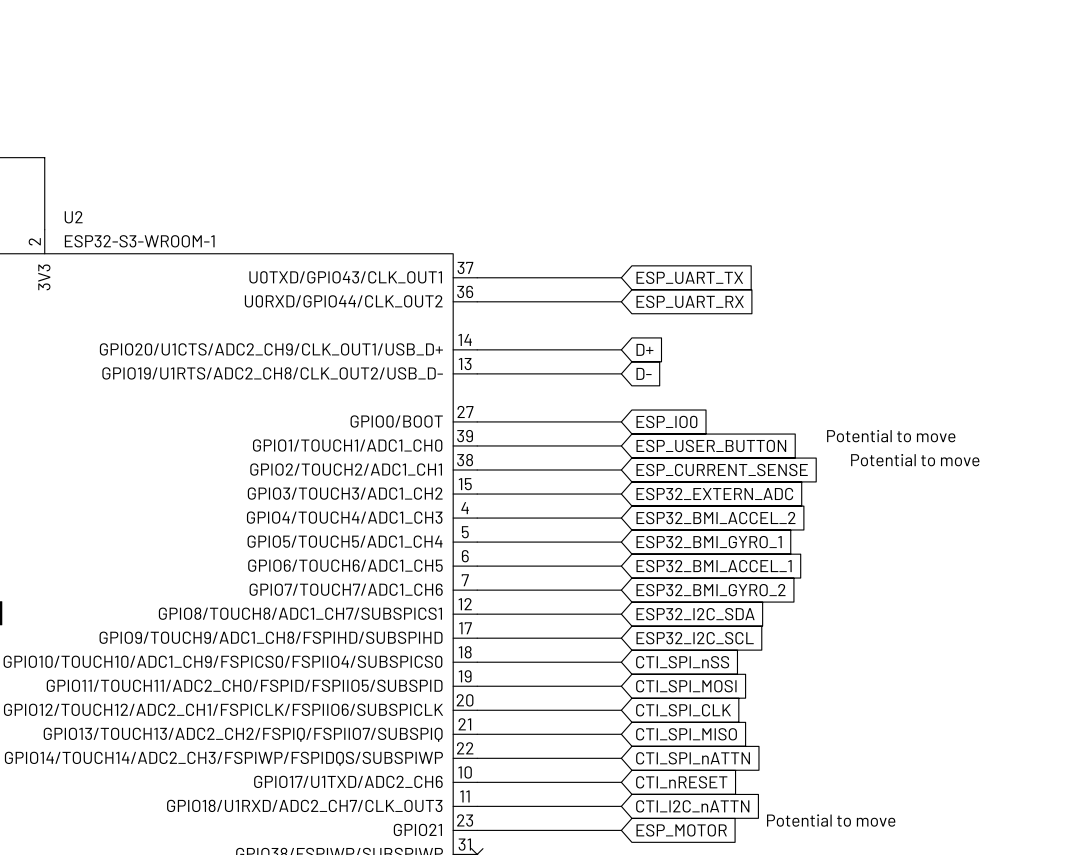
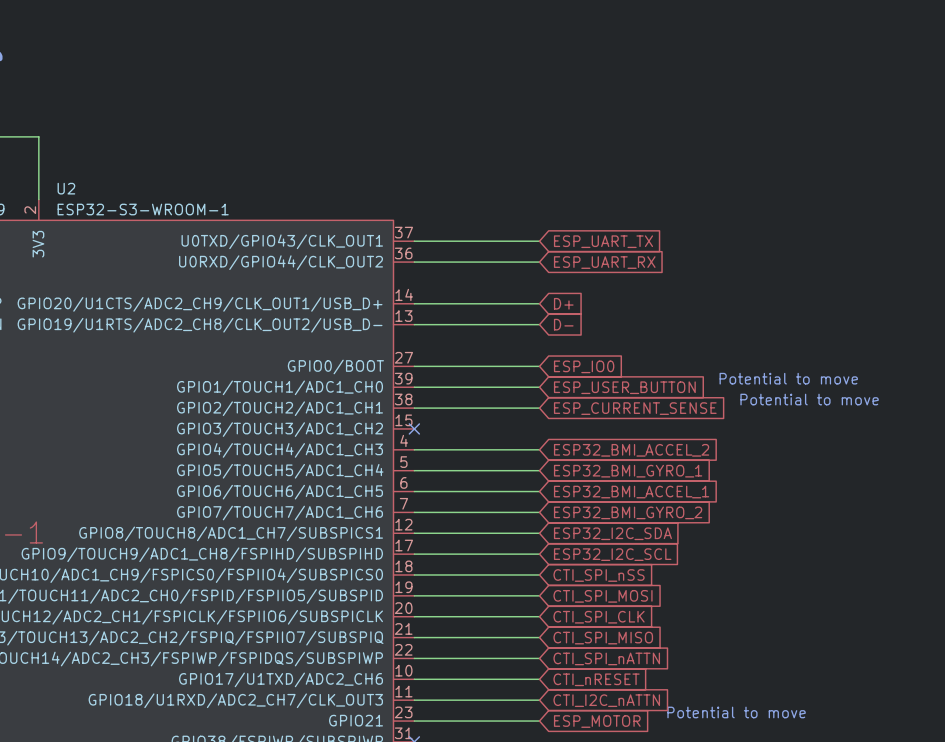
wire: (477, 494) (621, 494) -> none
no-connect mark: none -> (414, 428)
global label: ESP32_EXTERN_ADC (714, 494) -> none

